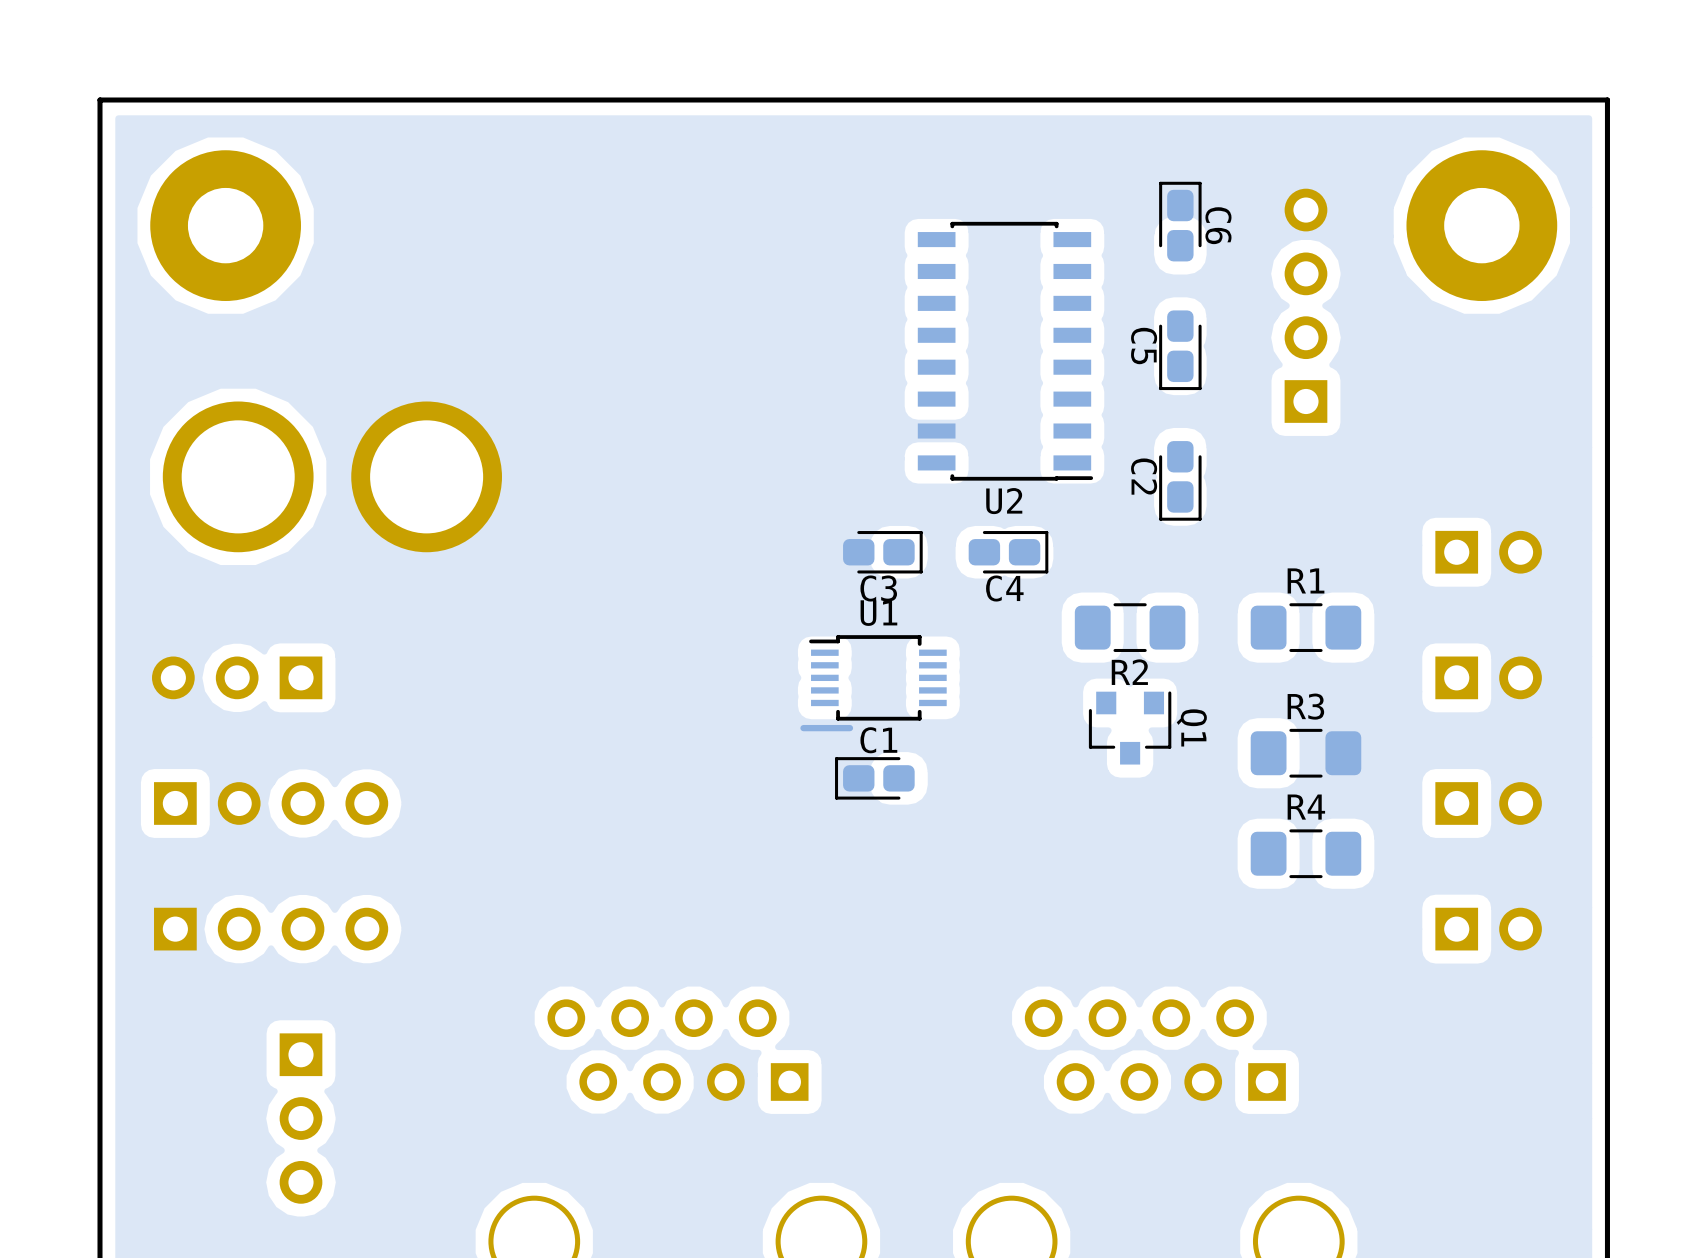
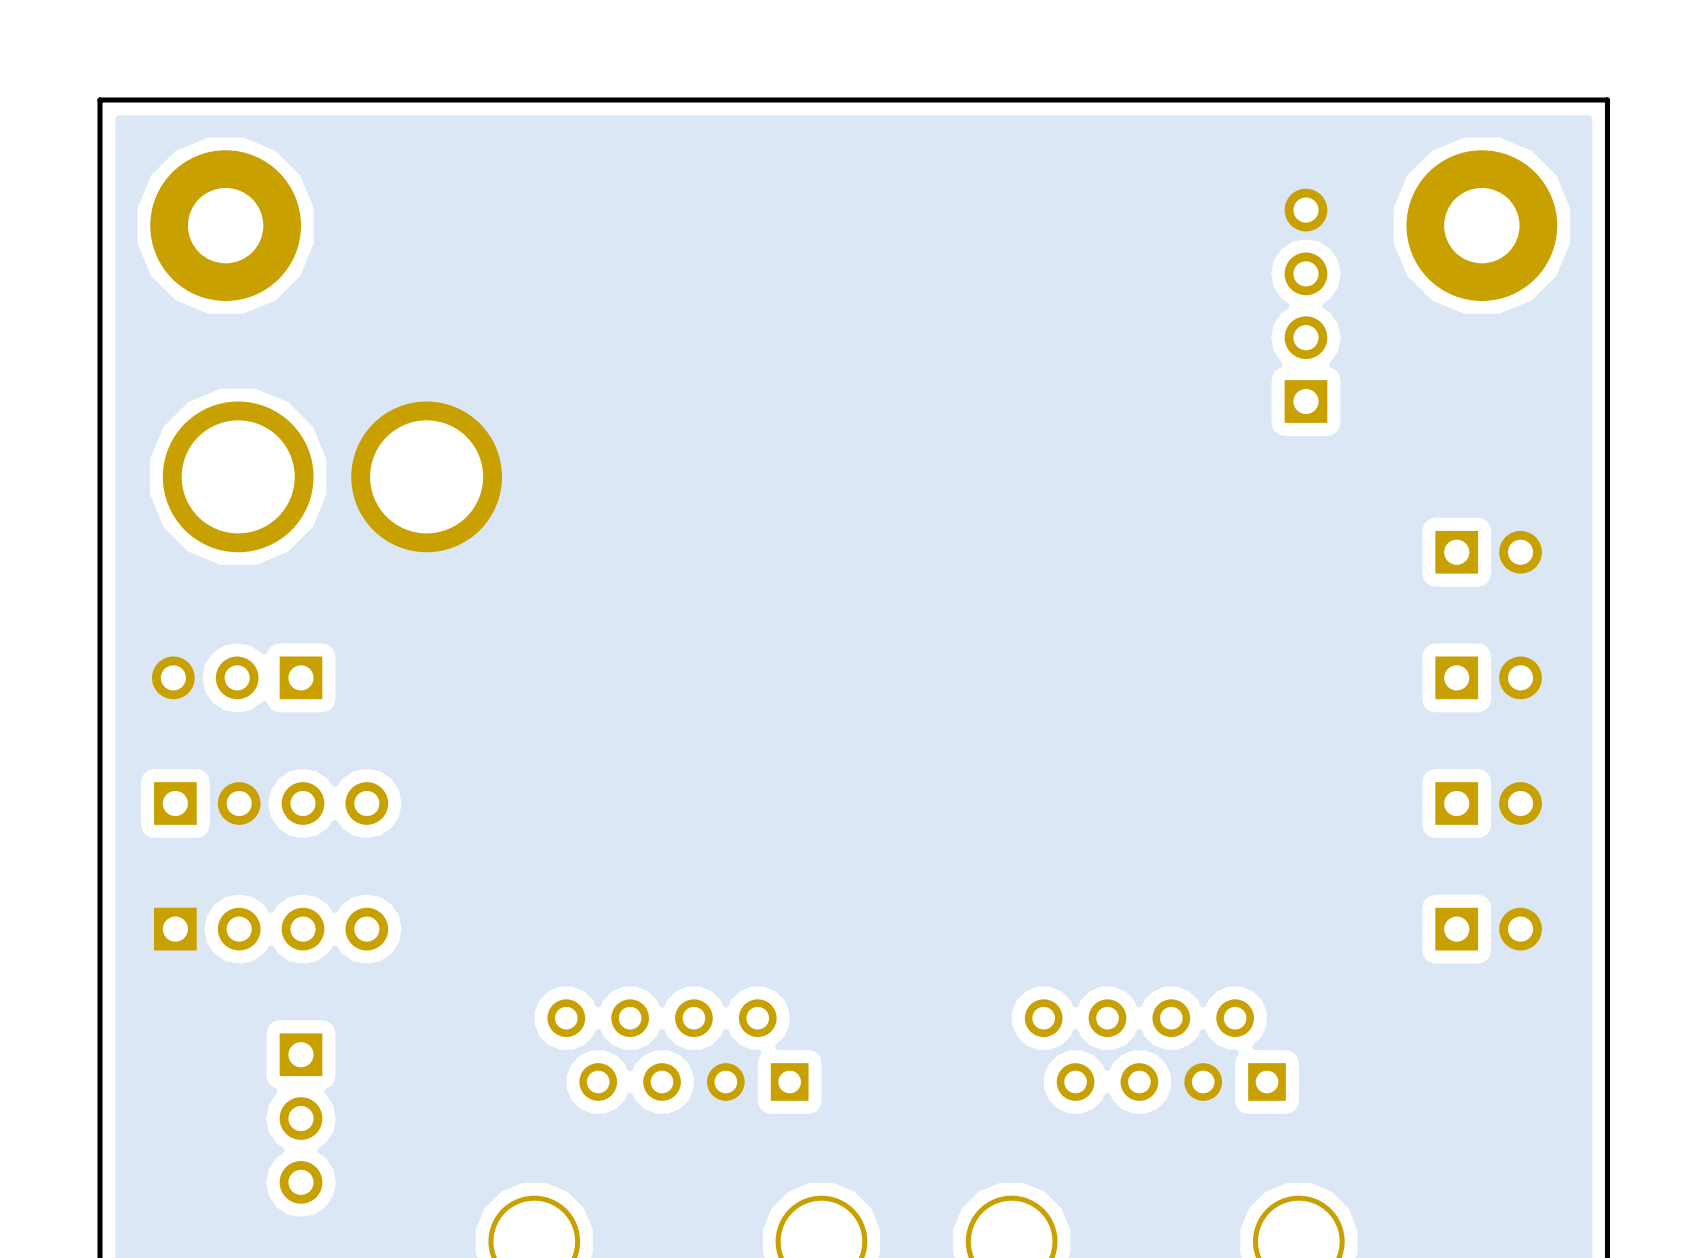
C6: (1180, 221) -> none
C5: (1180, 350) -> none
U2: (1005, 351) -> none
C2: (1180, 480) -> none
C3: (882, 552) -> none
C4: (1008, 552) -> none
R2: (1130, 627) -> none
R1: (1305, 627) -> none
U1: (877, 677) -> none
Q1: (1130, 727) -> none
track: (849, 728) (803, 728) -> none
R3: (1305, 753) -> none
C1: (874, 778) -> none
R4: (1305, 853) -> none

